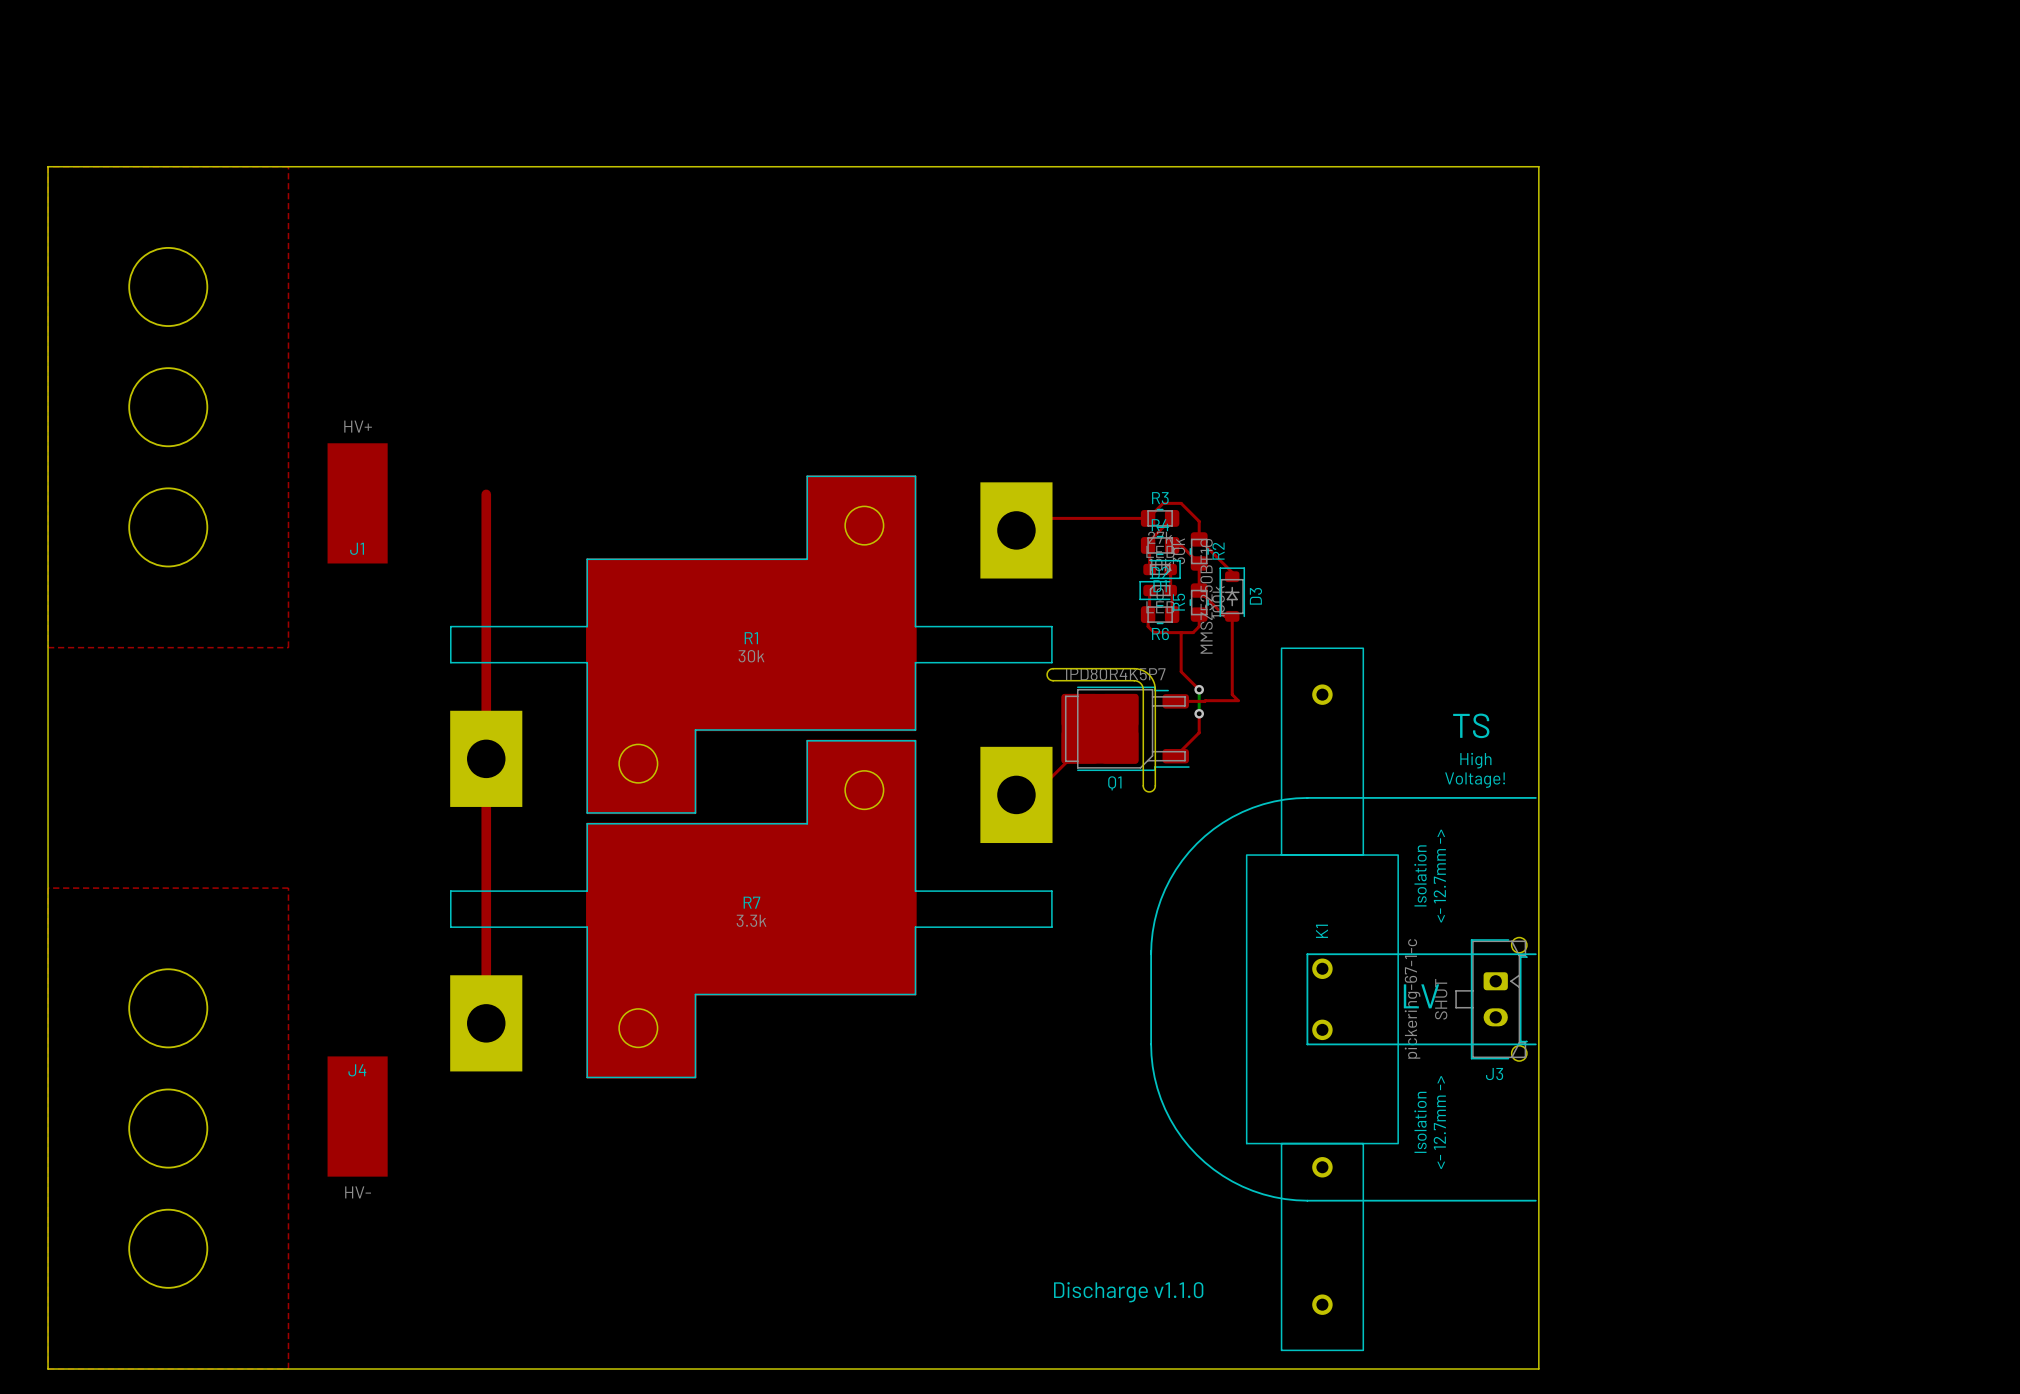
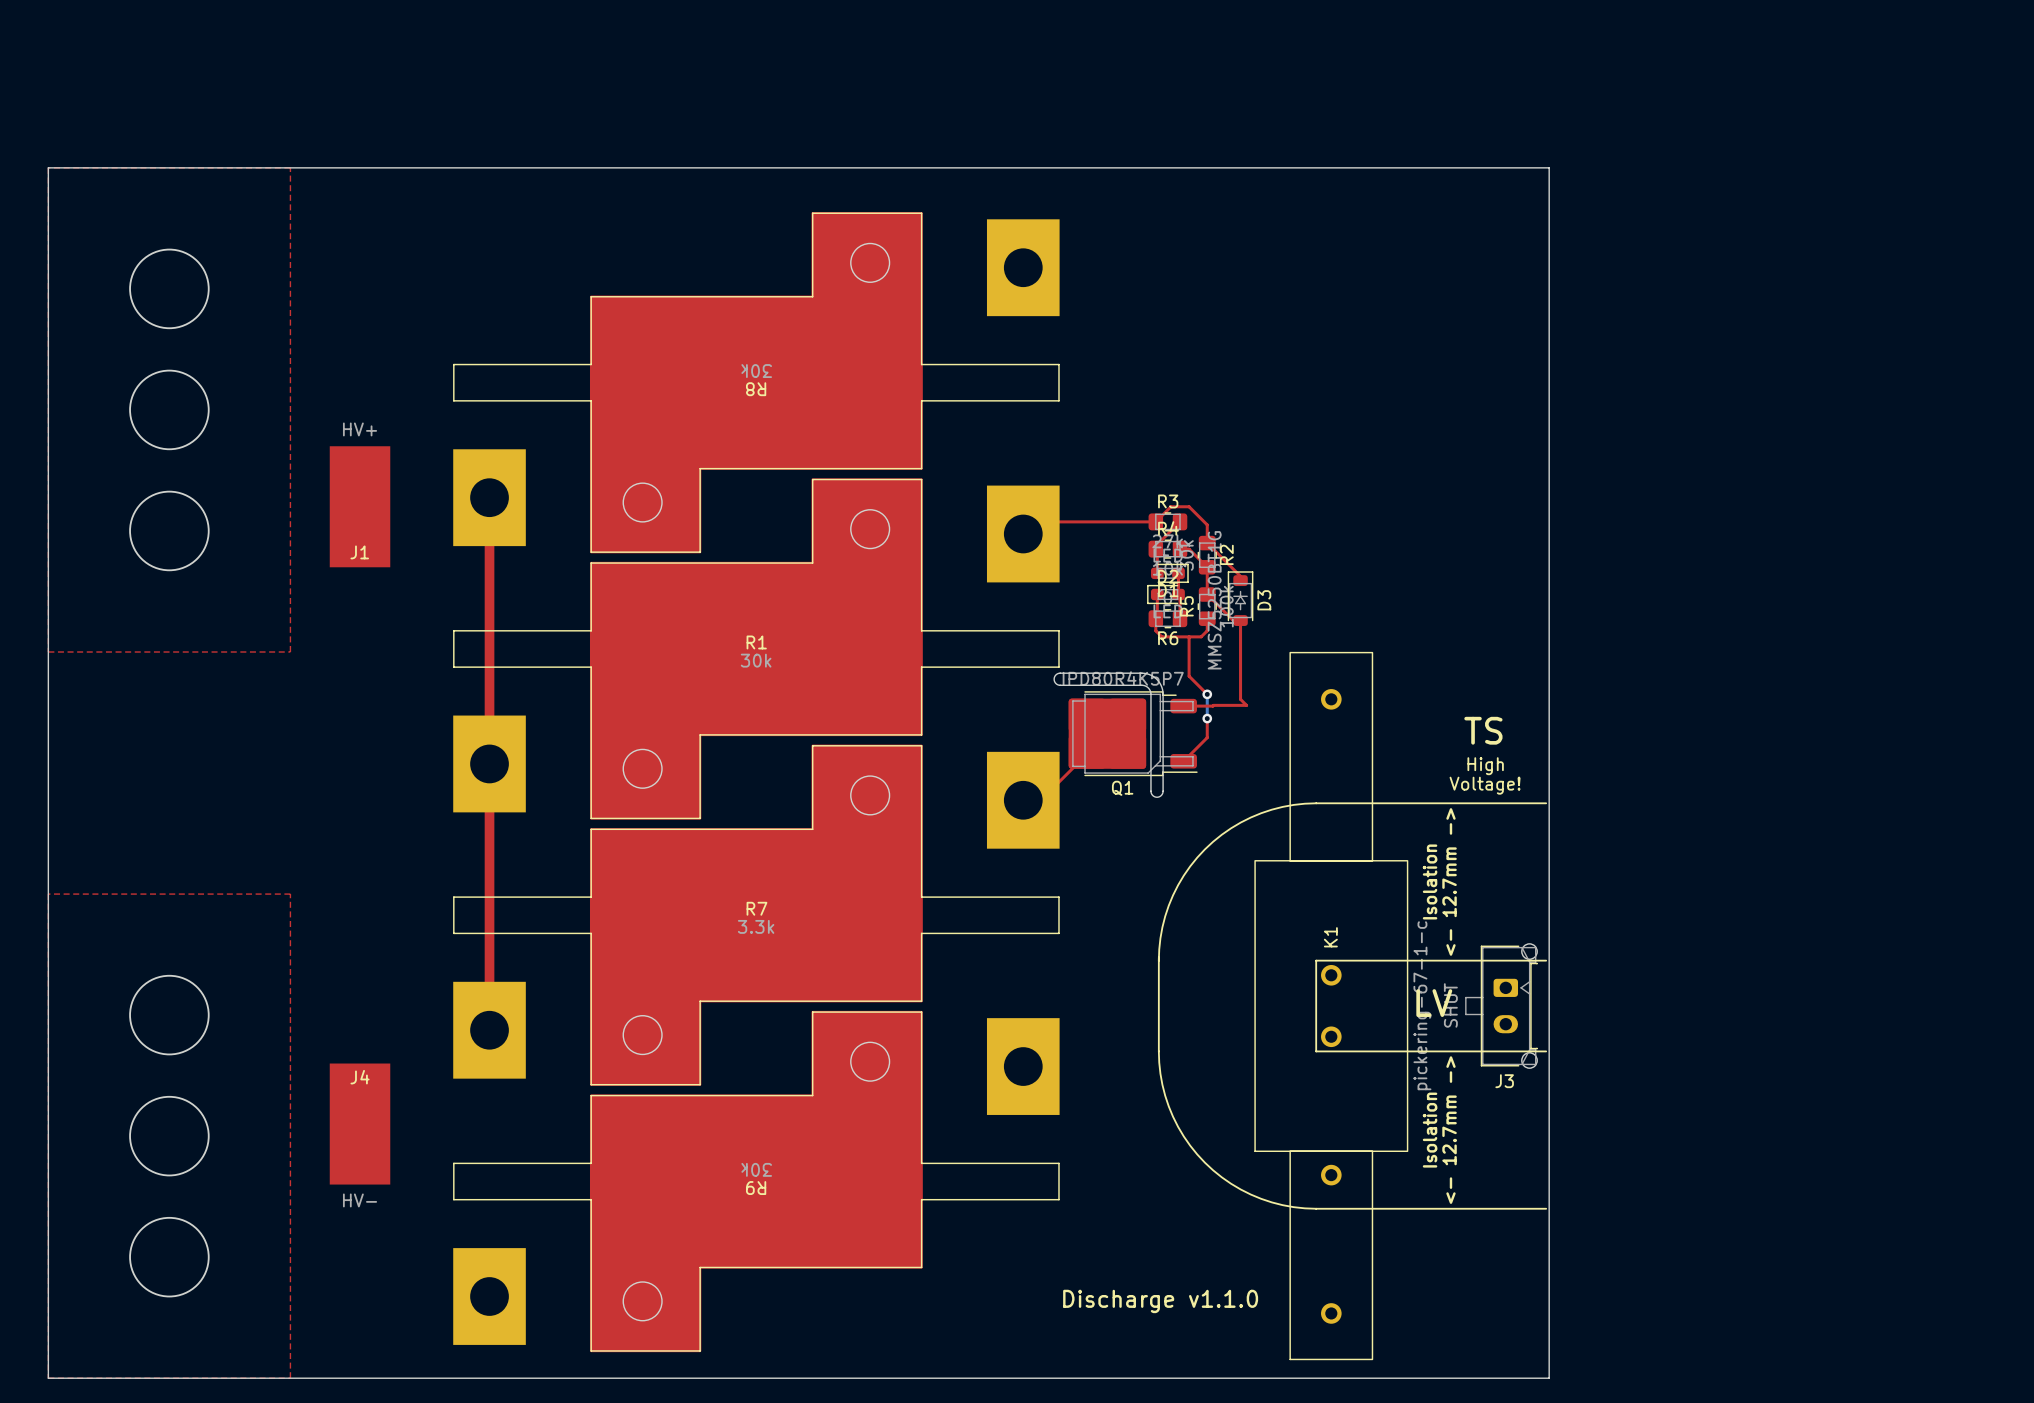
R8: none -> 30k (756, 382)
R9: none -> 30k (756, 1181)

